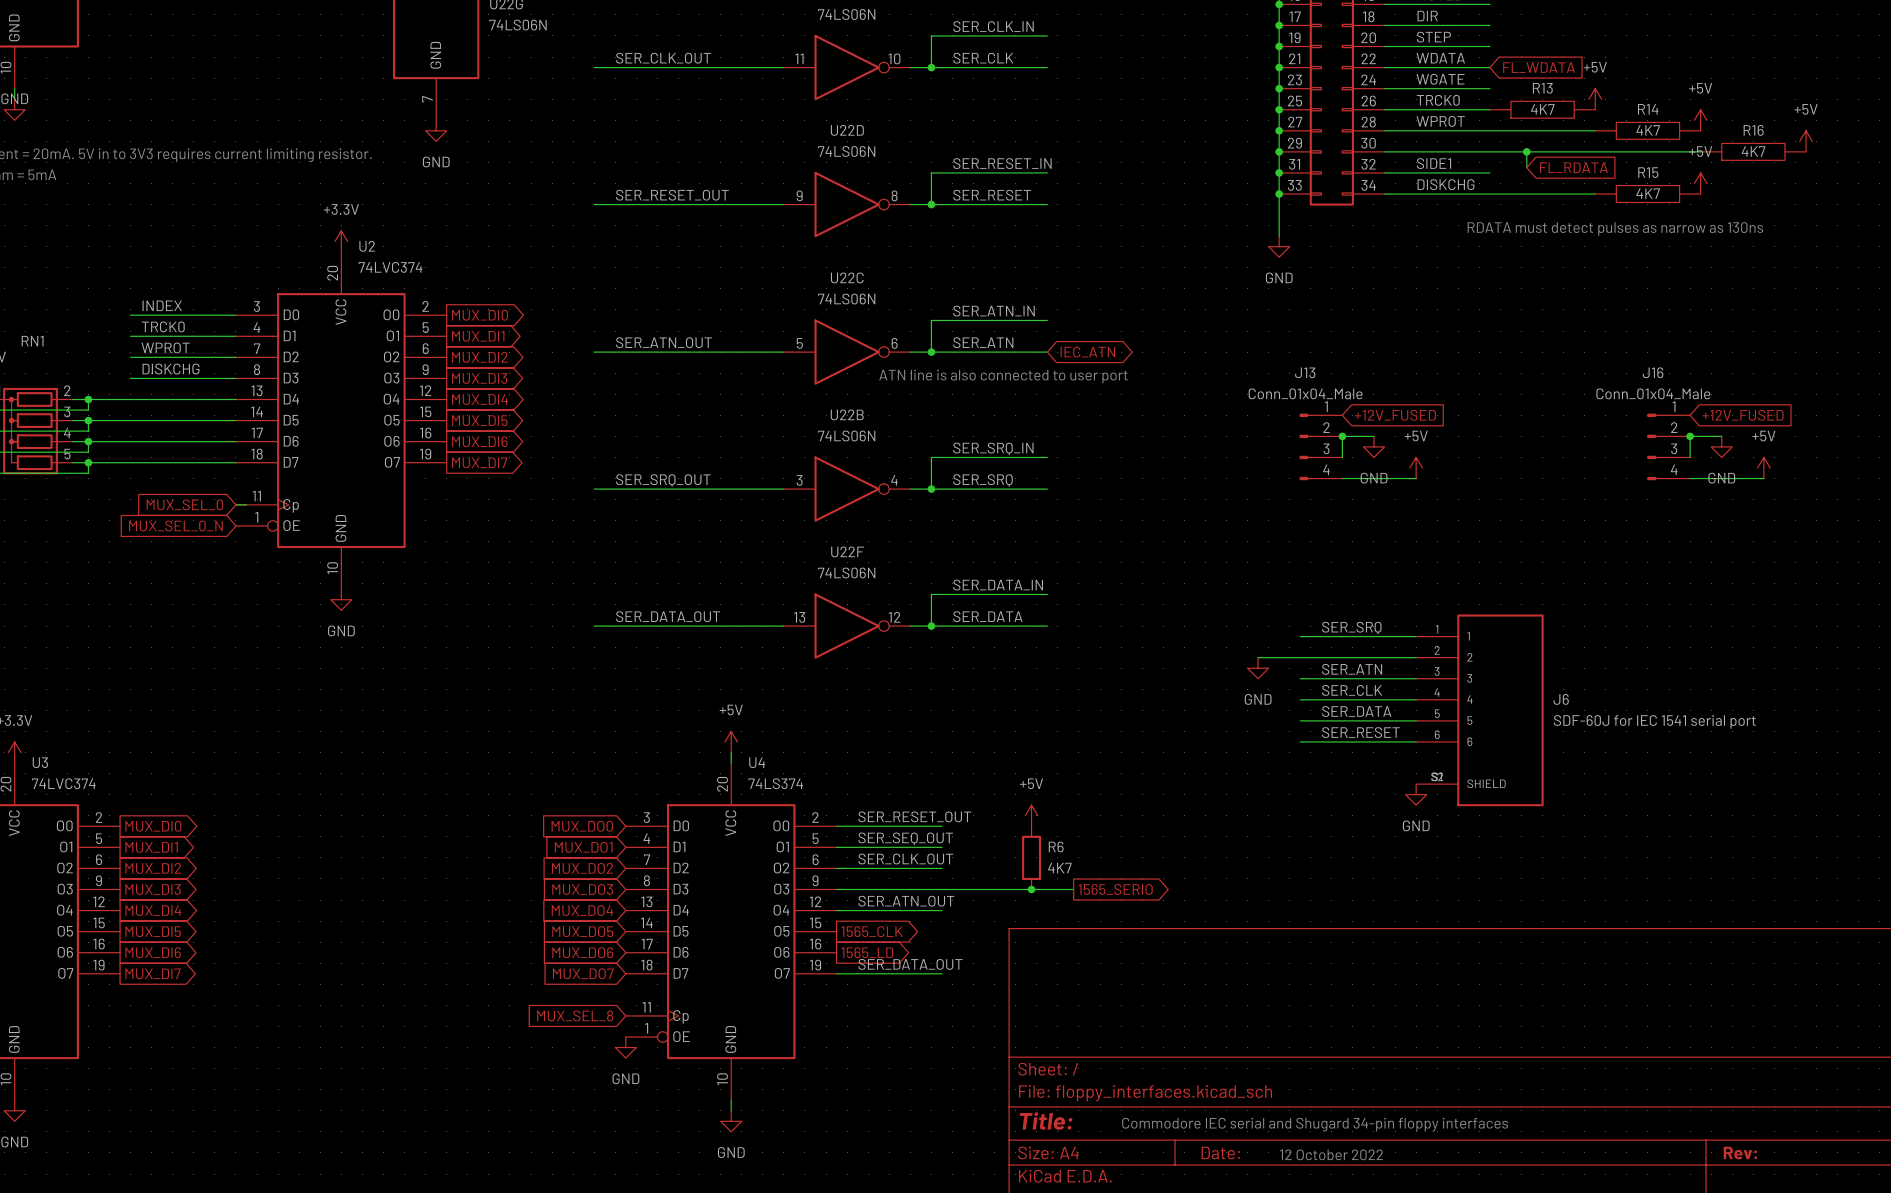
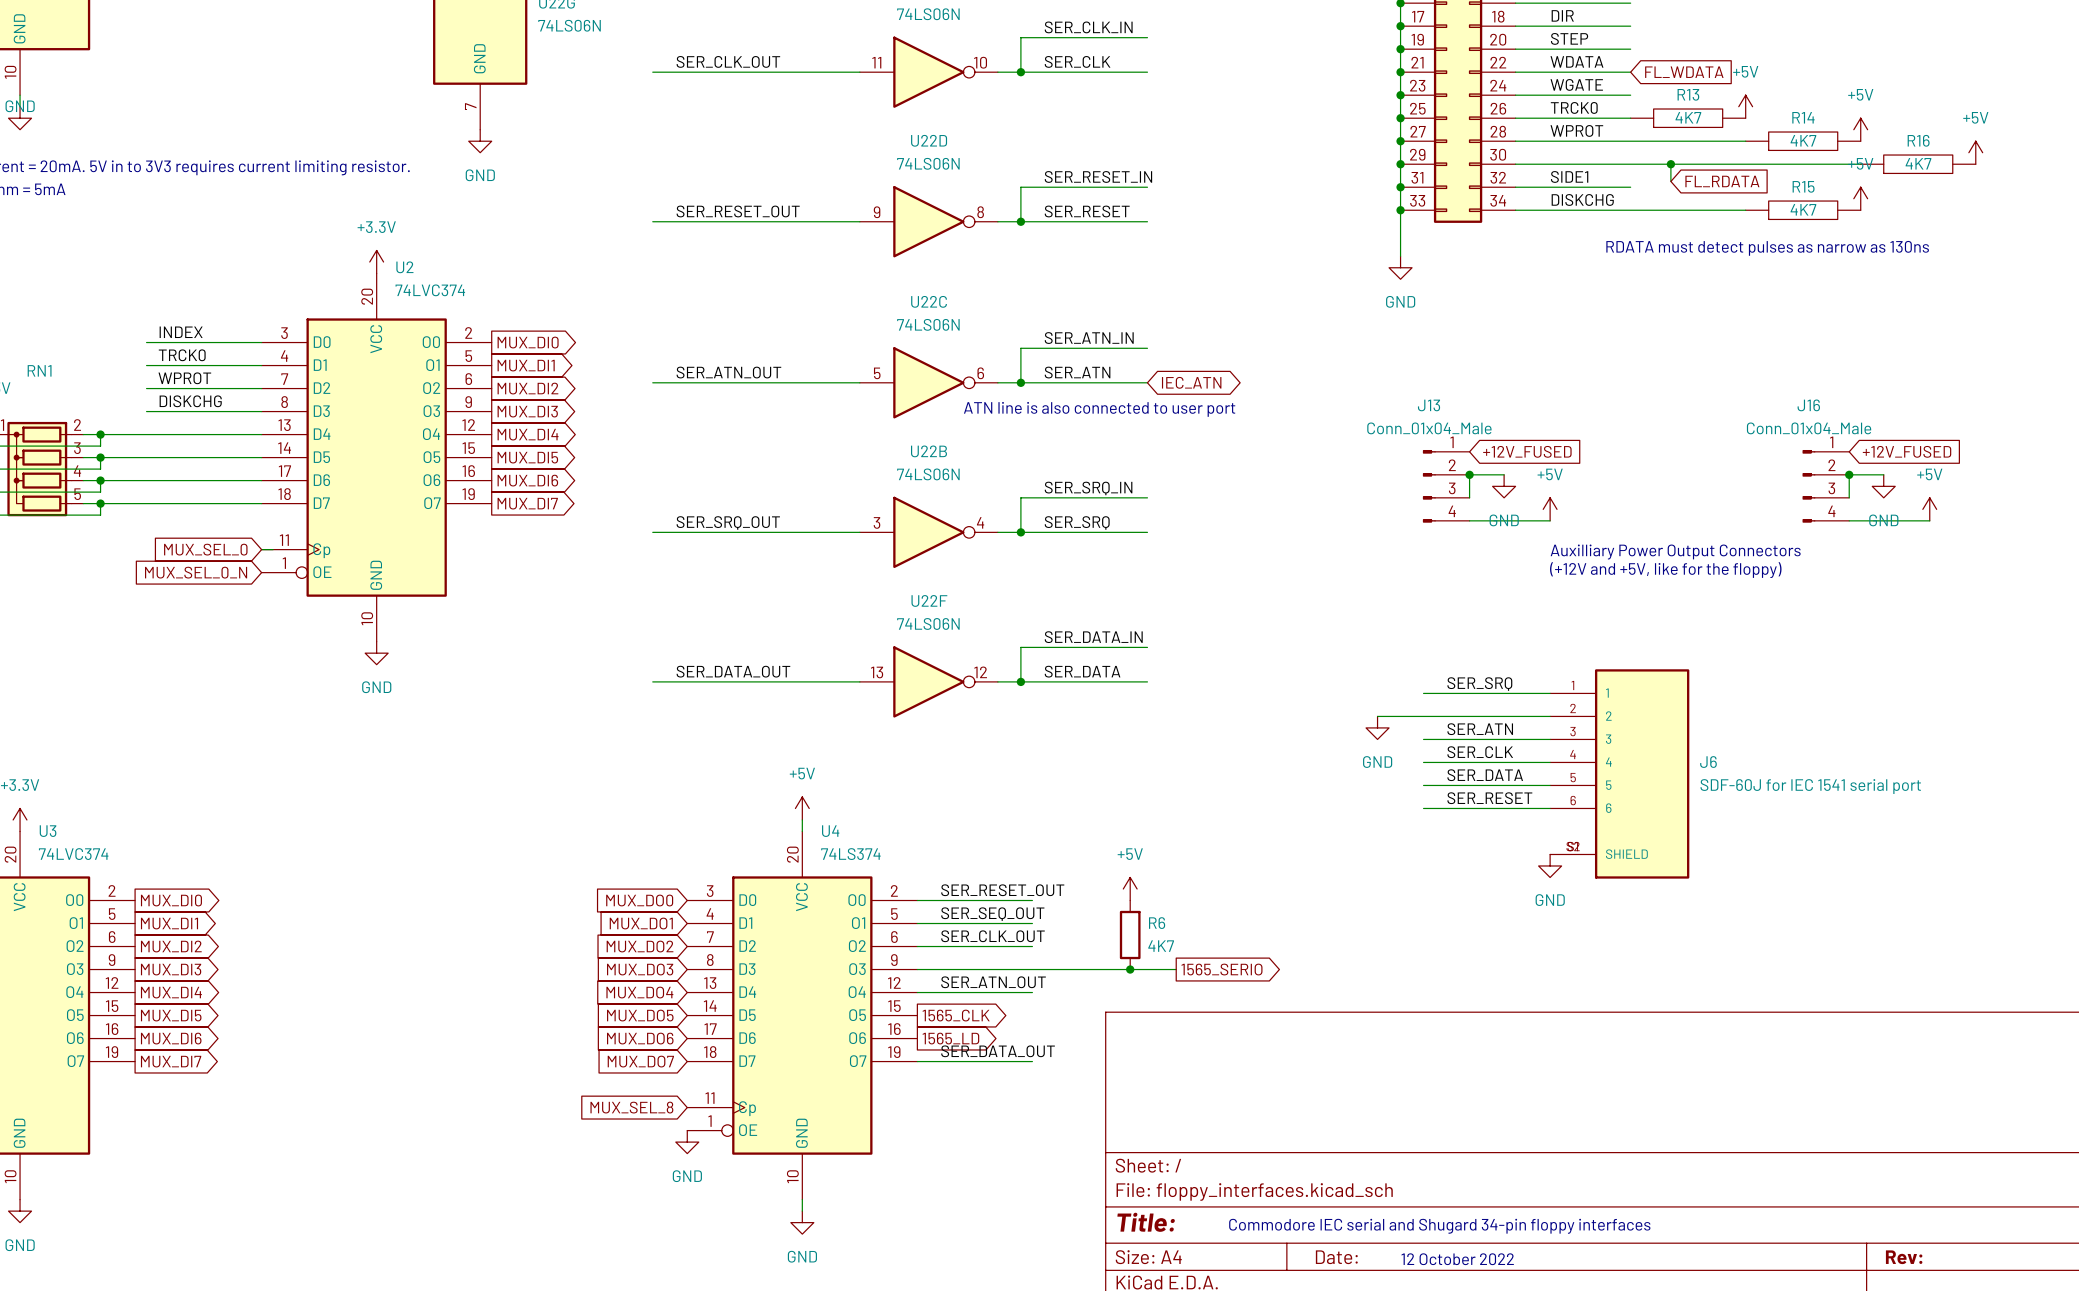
text: none -> Auxilliary Power Output Connectors (1675, 551)
text: none -> (+12V and +5V, like for the floppy) (1665, 570)

